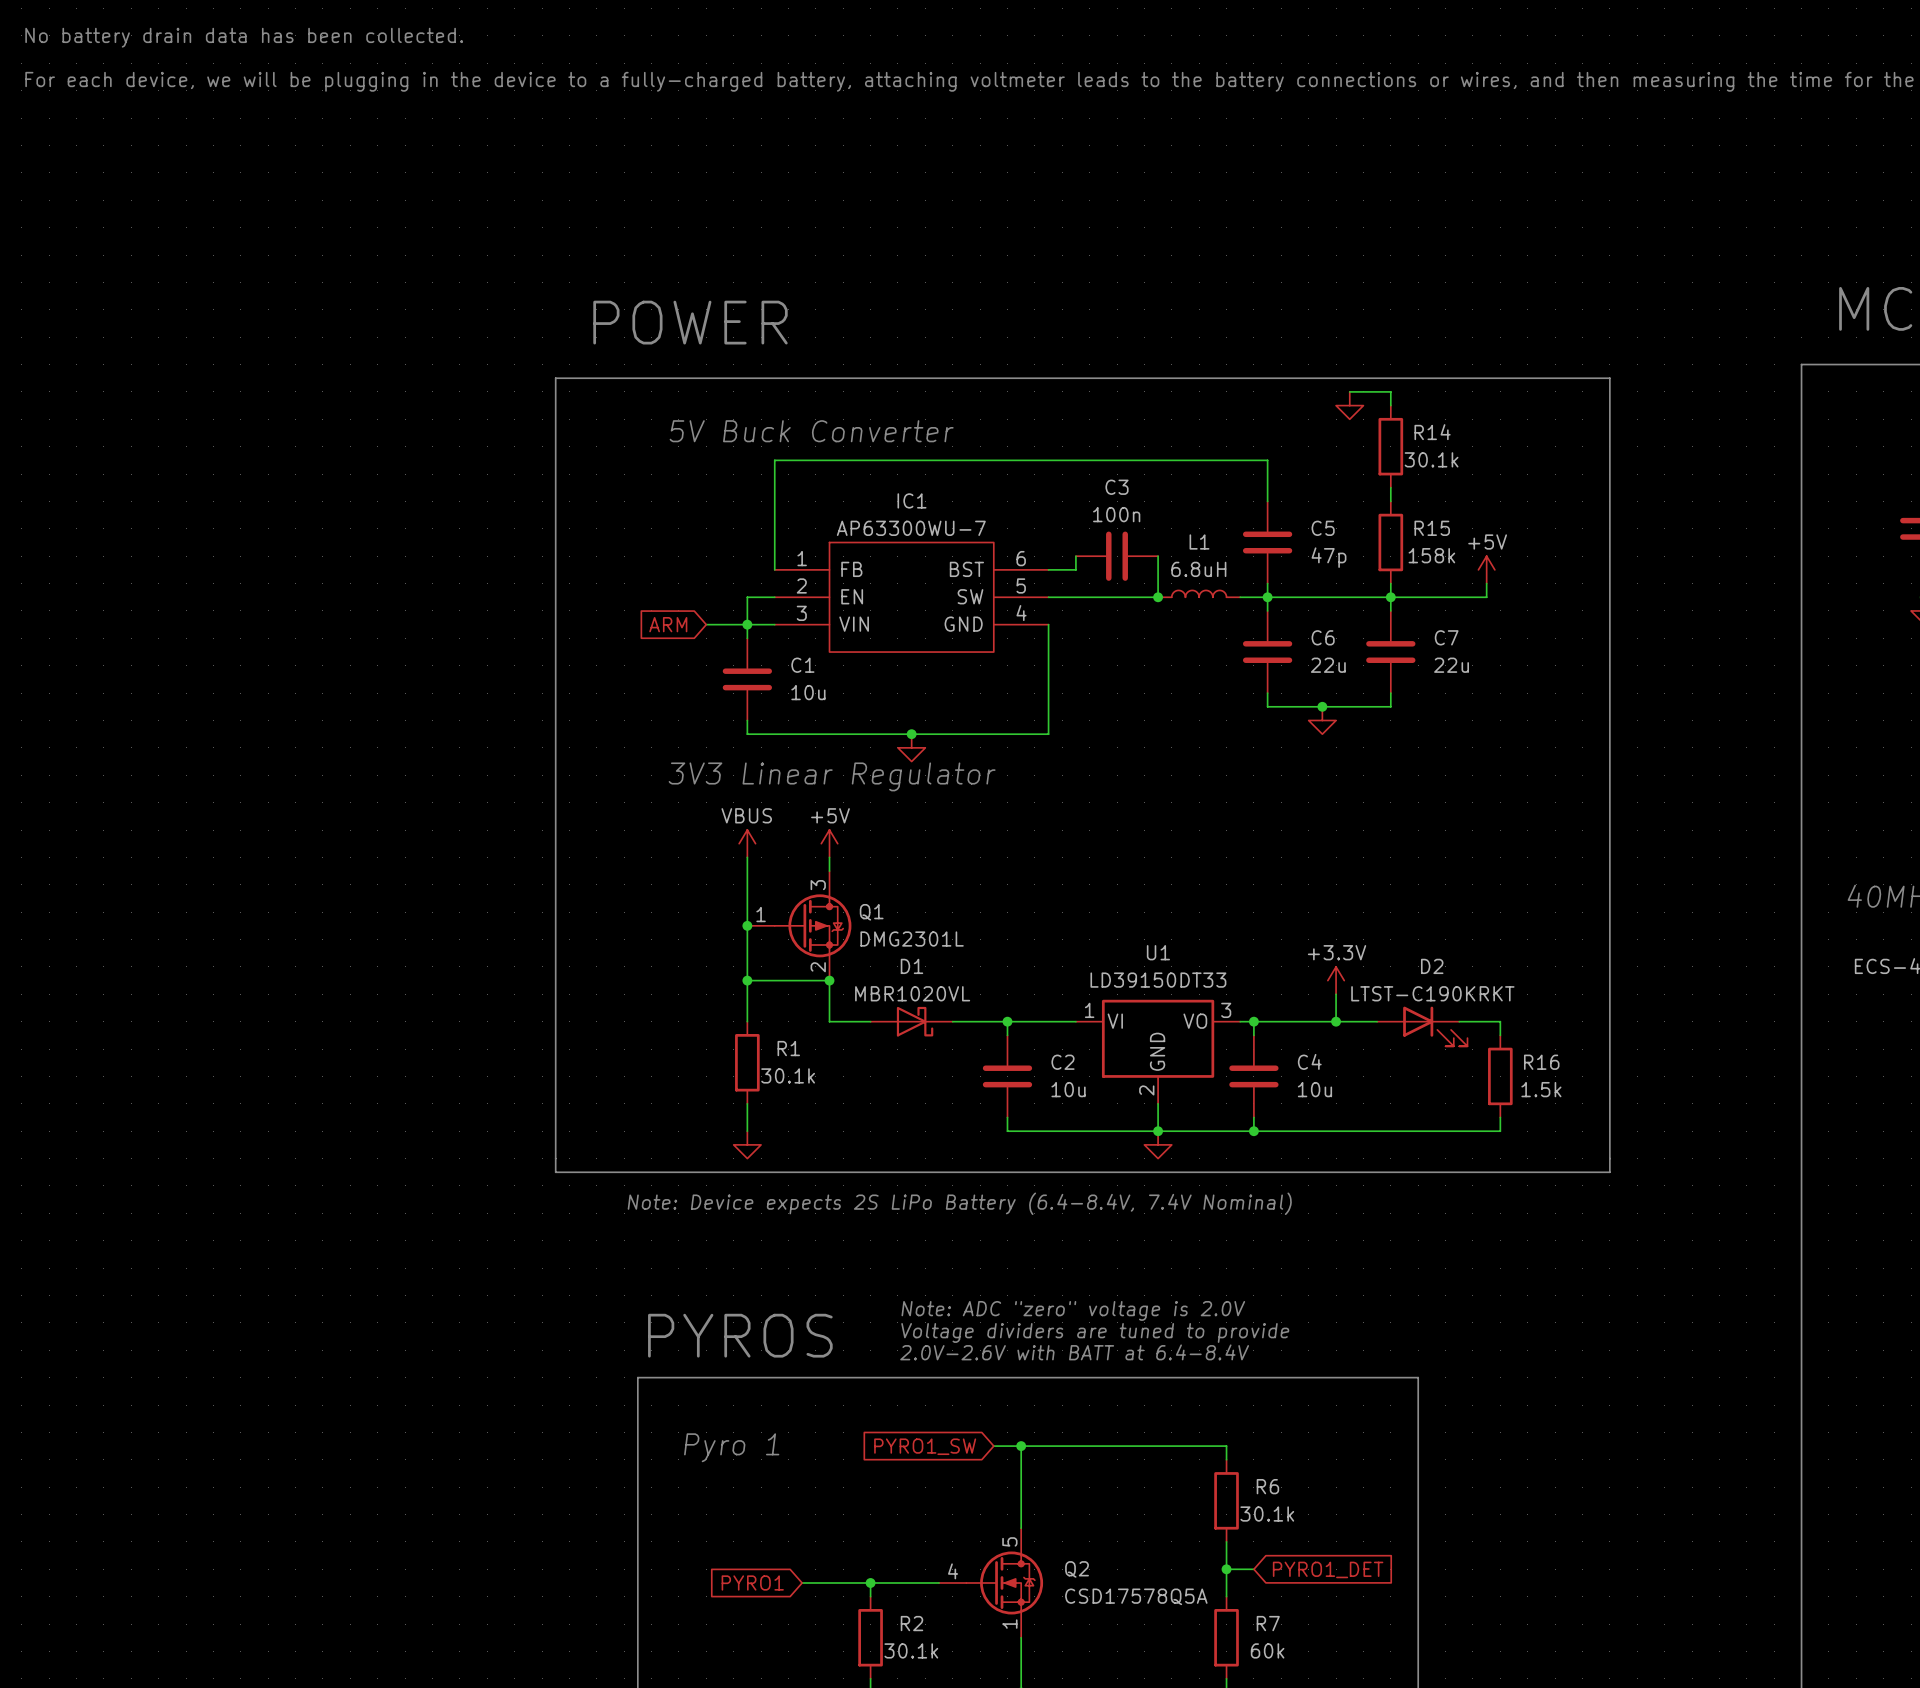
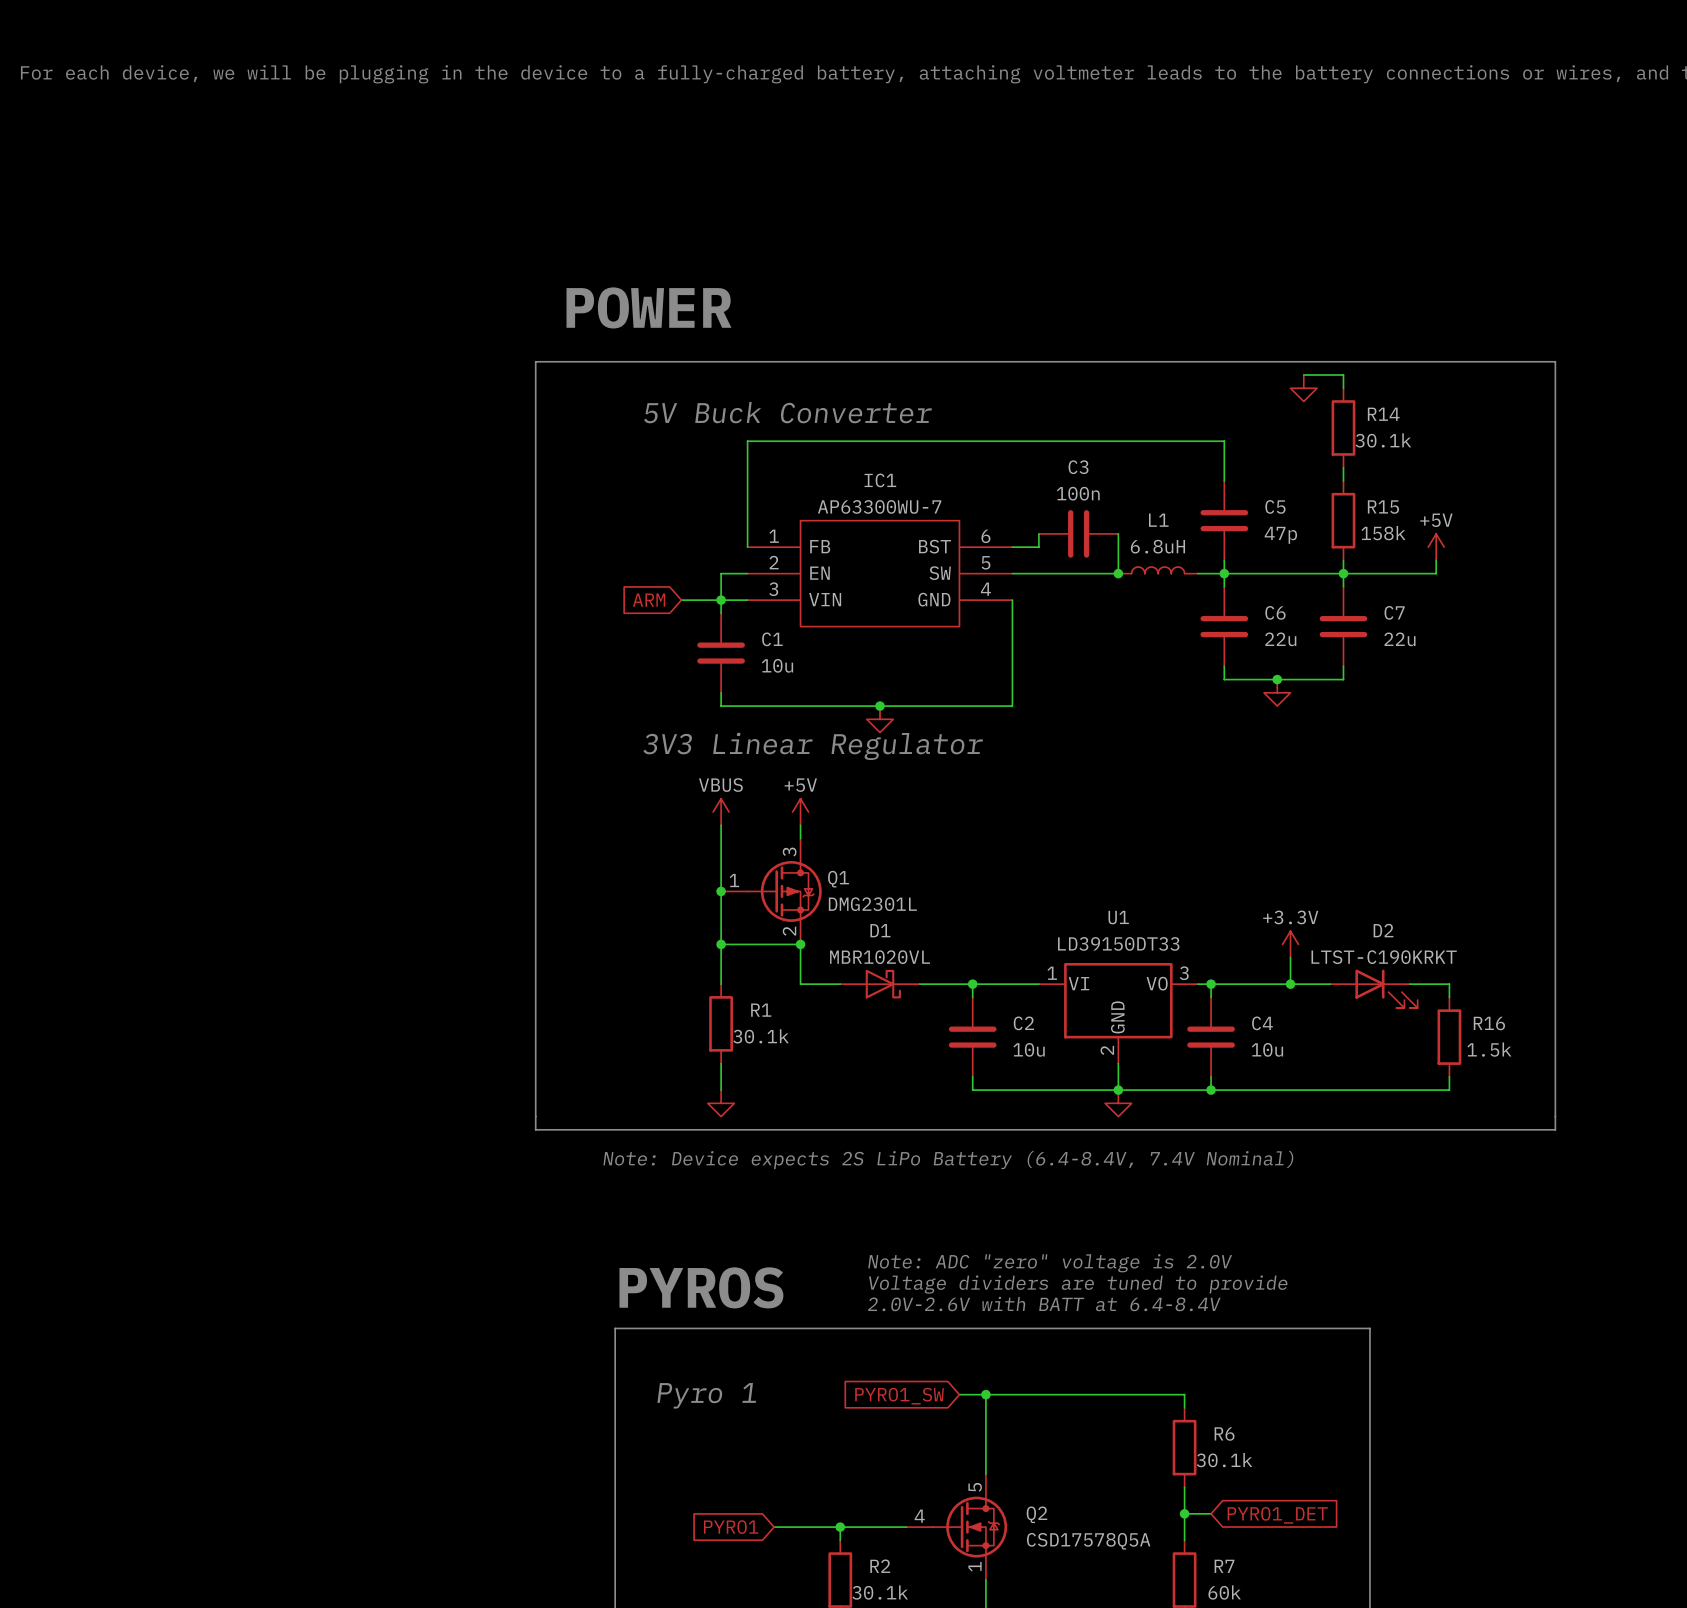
text: No battery drain data has been collected. (244, 37) -> none

